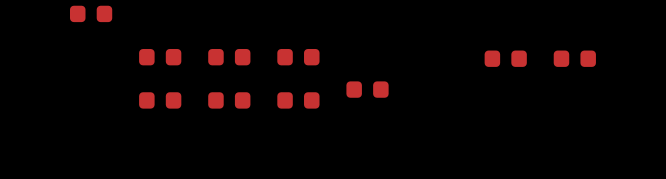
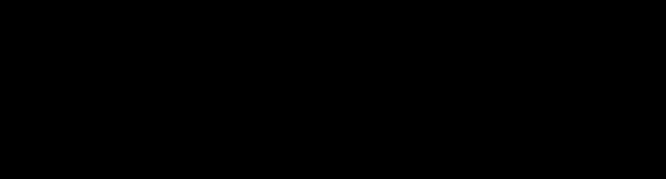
part: (91, 13) -> none
part: (160, 57) -> none
part: (229, 57) -> none
part: (298, 57) -> none
part: (505, 58) -> none
part: (574, 58) -> none
part: (367, 89) -> none
part: (160, 100) -> none
part: (229, 100) -> none
part: (298, 100) -> none

